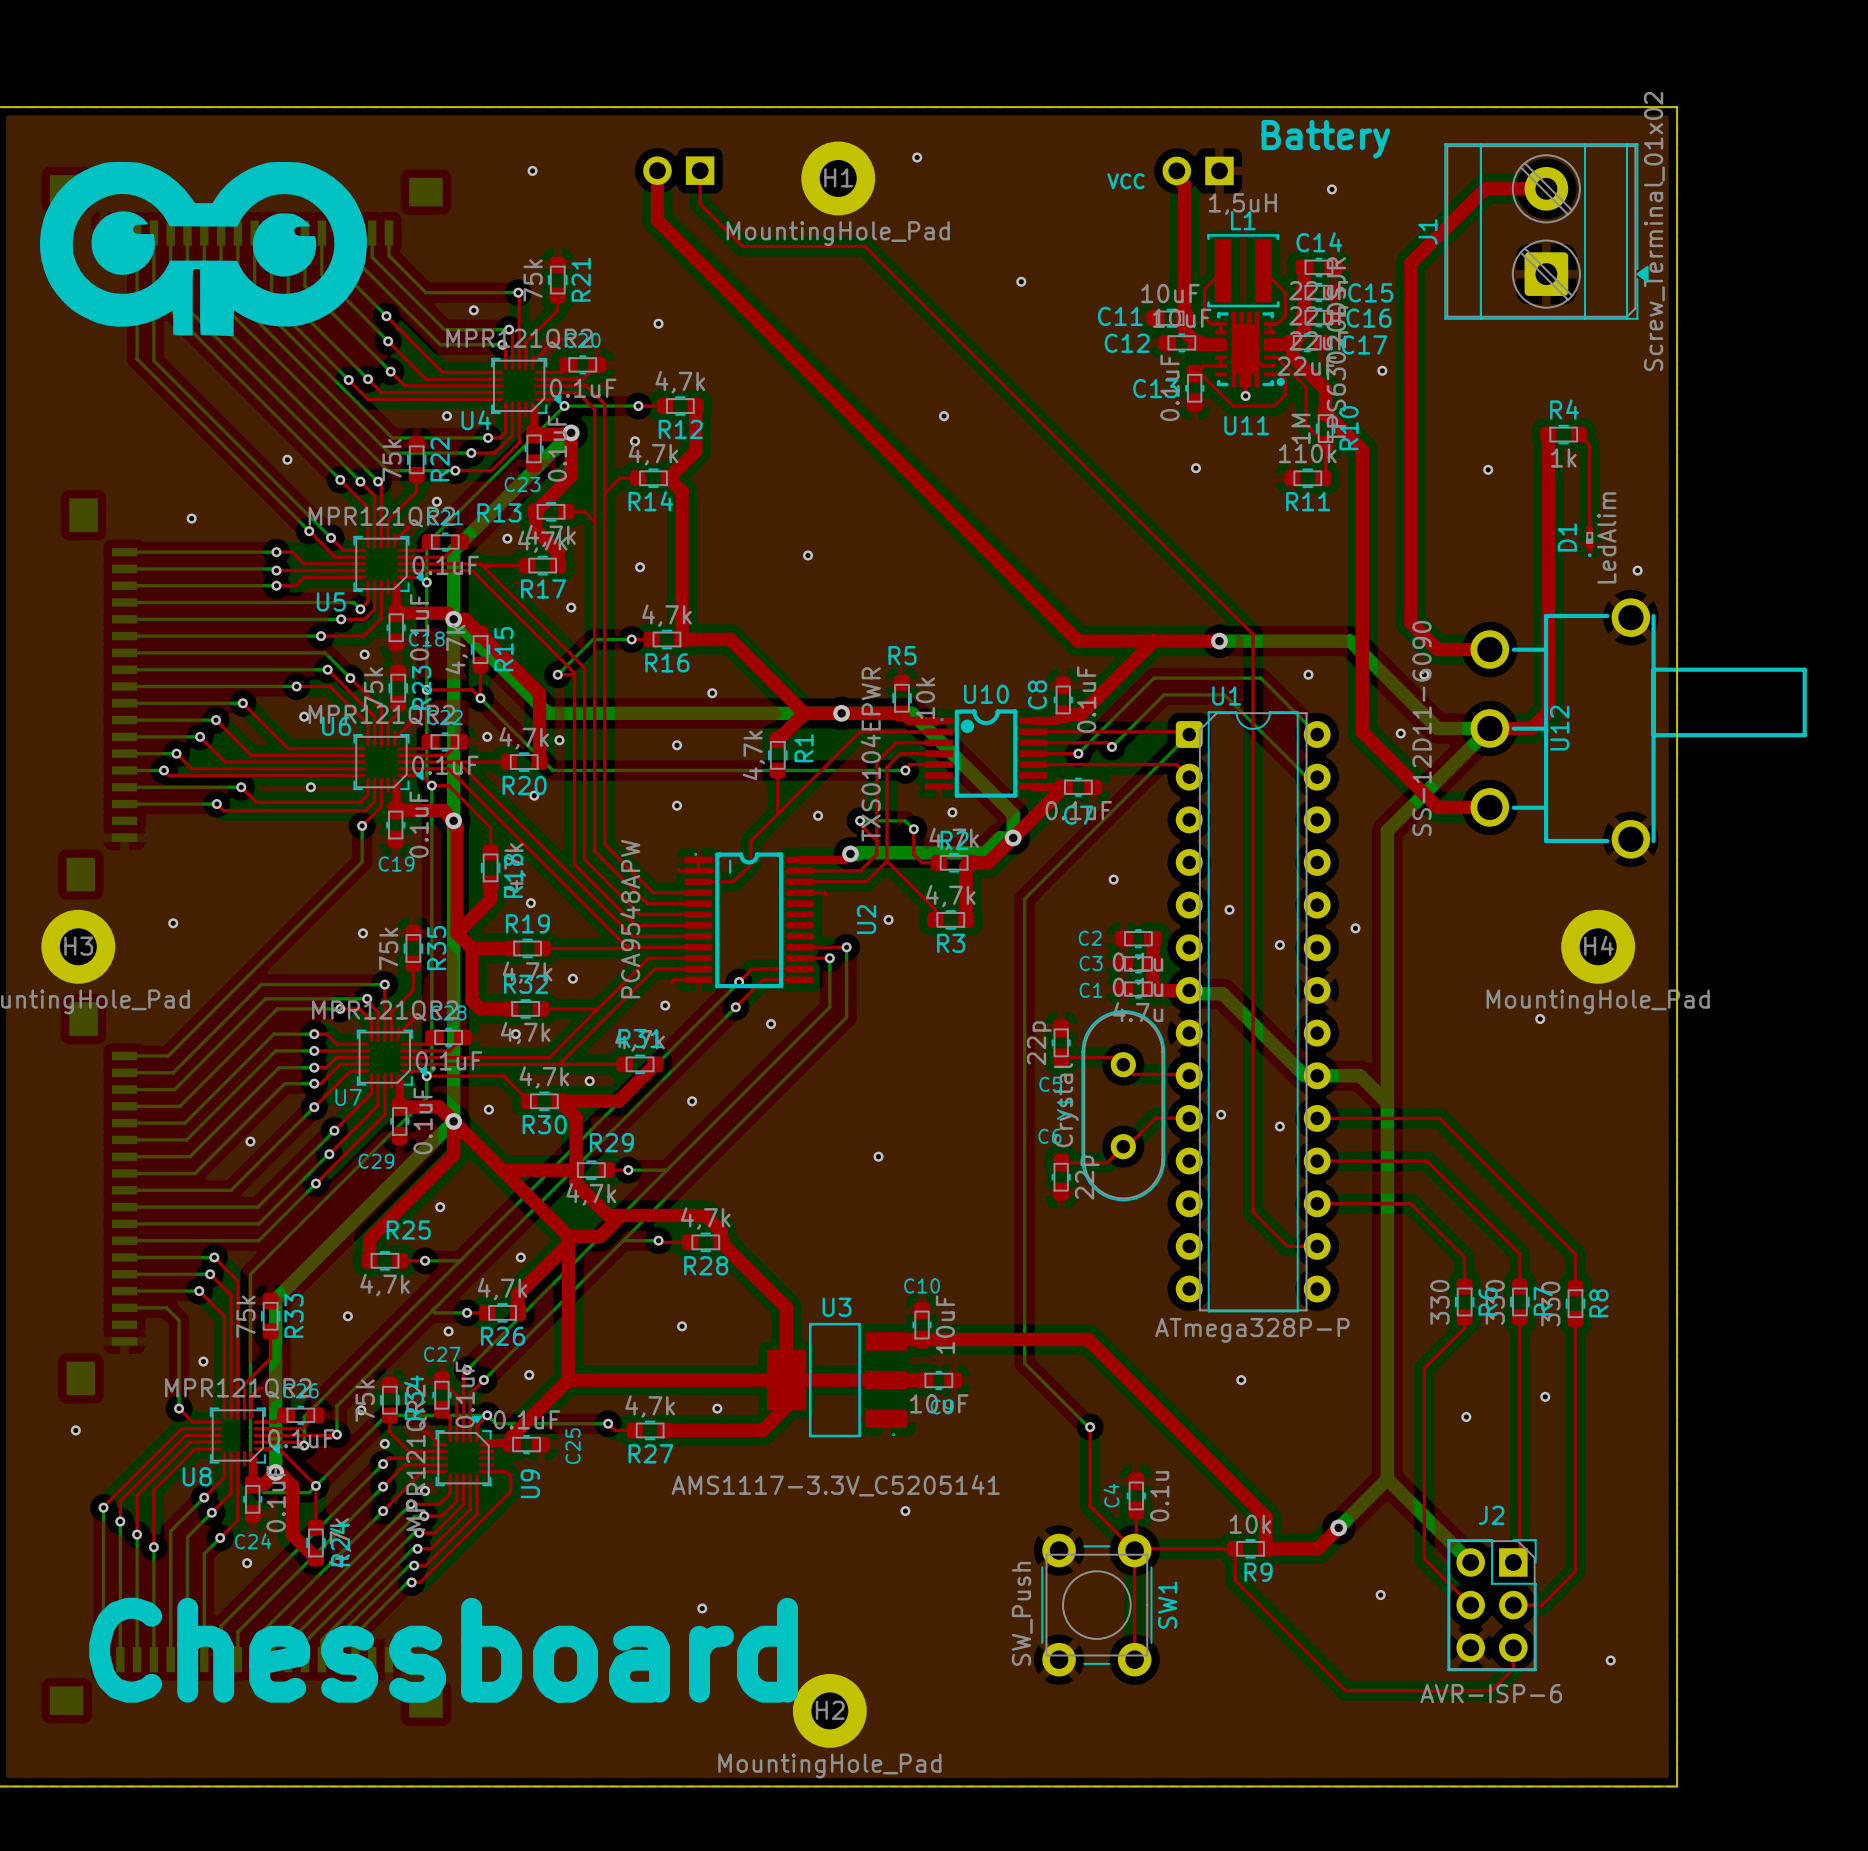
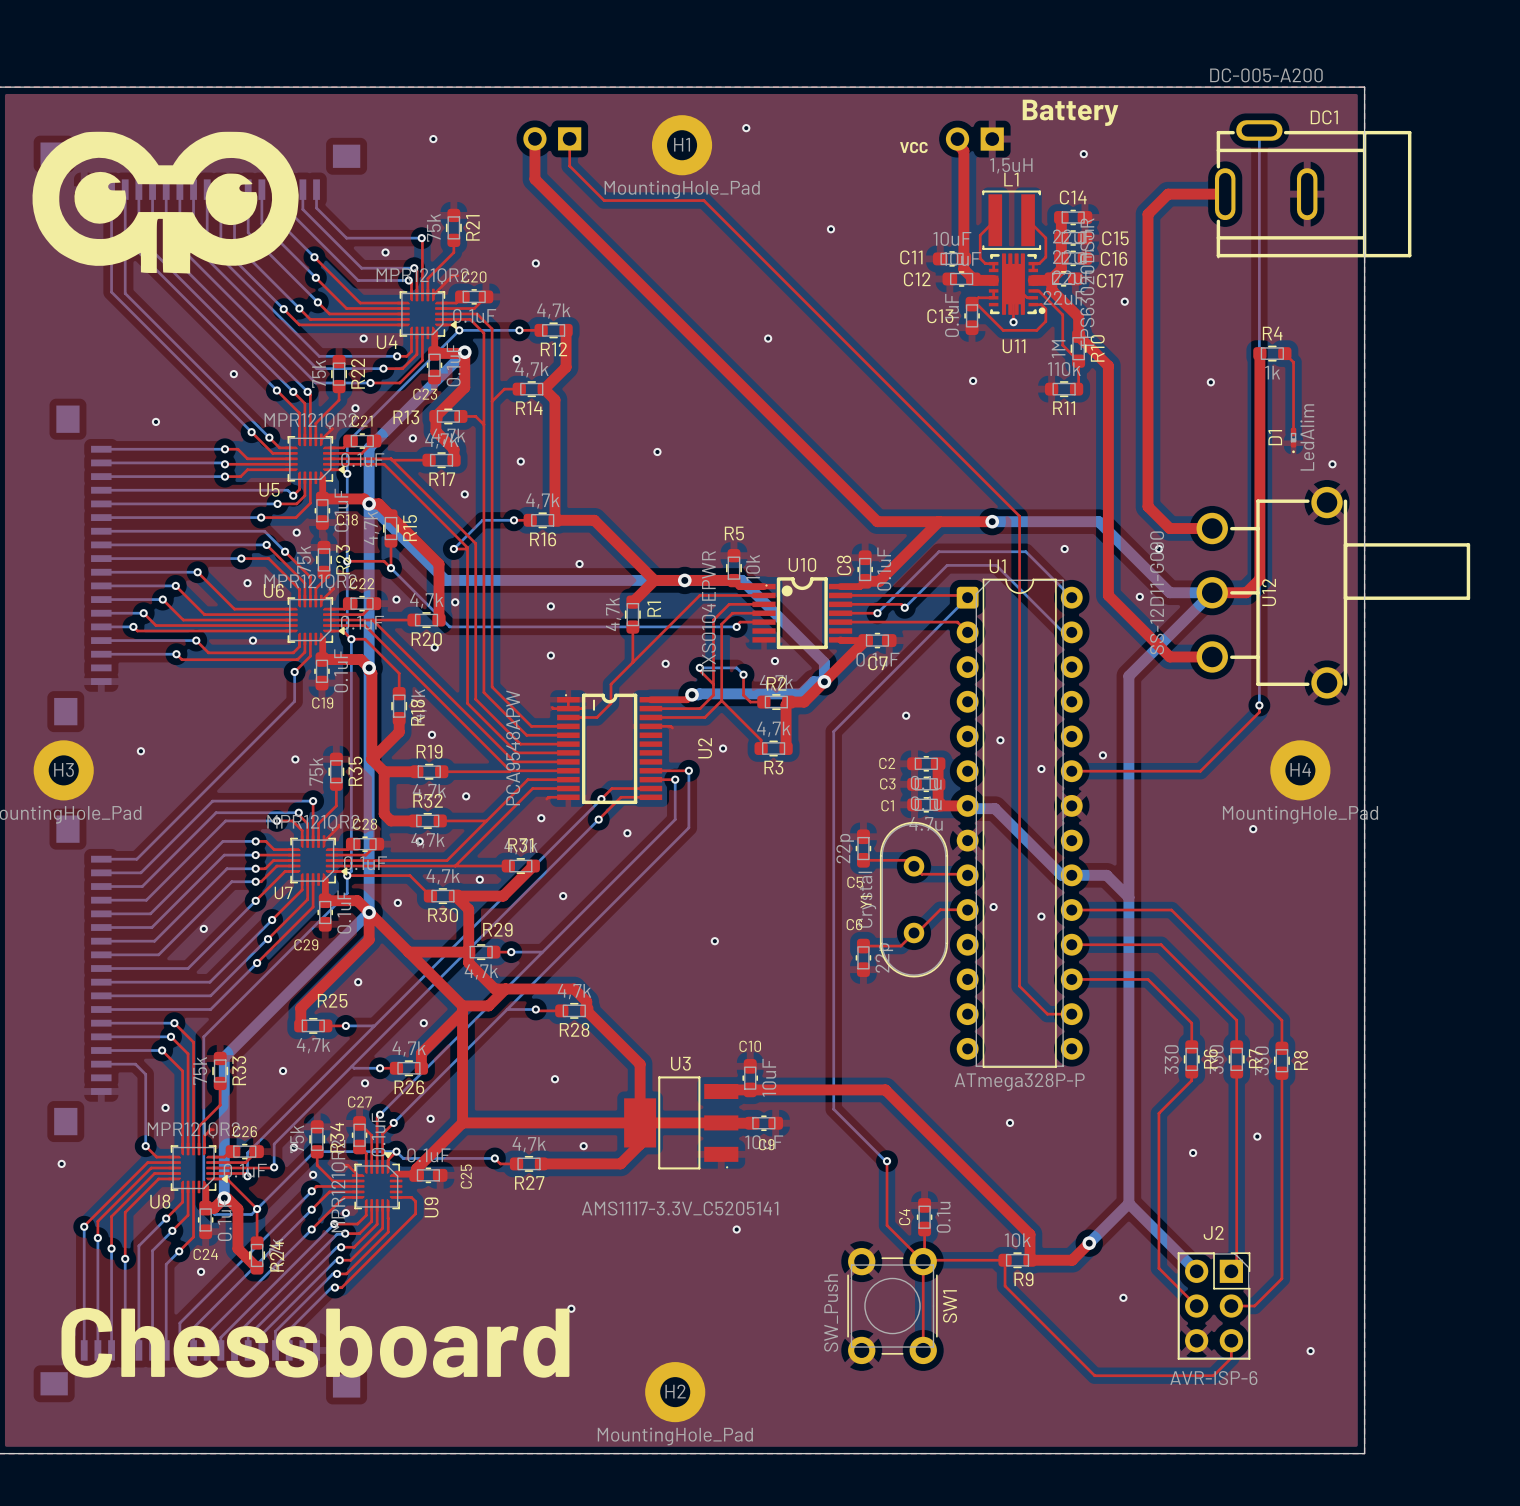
bottom track: none -> (1259, 130) (1259, 705)
top track: (1546, 188) (1485, 188) (1435, 238) -> (1225, 194) (1168, 194)
J1: Screw_Terminal_01x02 (1546, 231) -> none
DC1: none -> DC-005-A200 (1313, 189)
top track: none -> (1259, 705) (1259, 712) (1200, 771) (1071, 771)
via: none -> (1259, 705)

